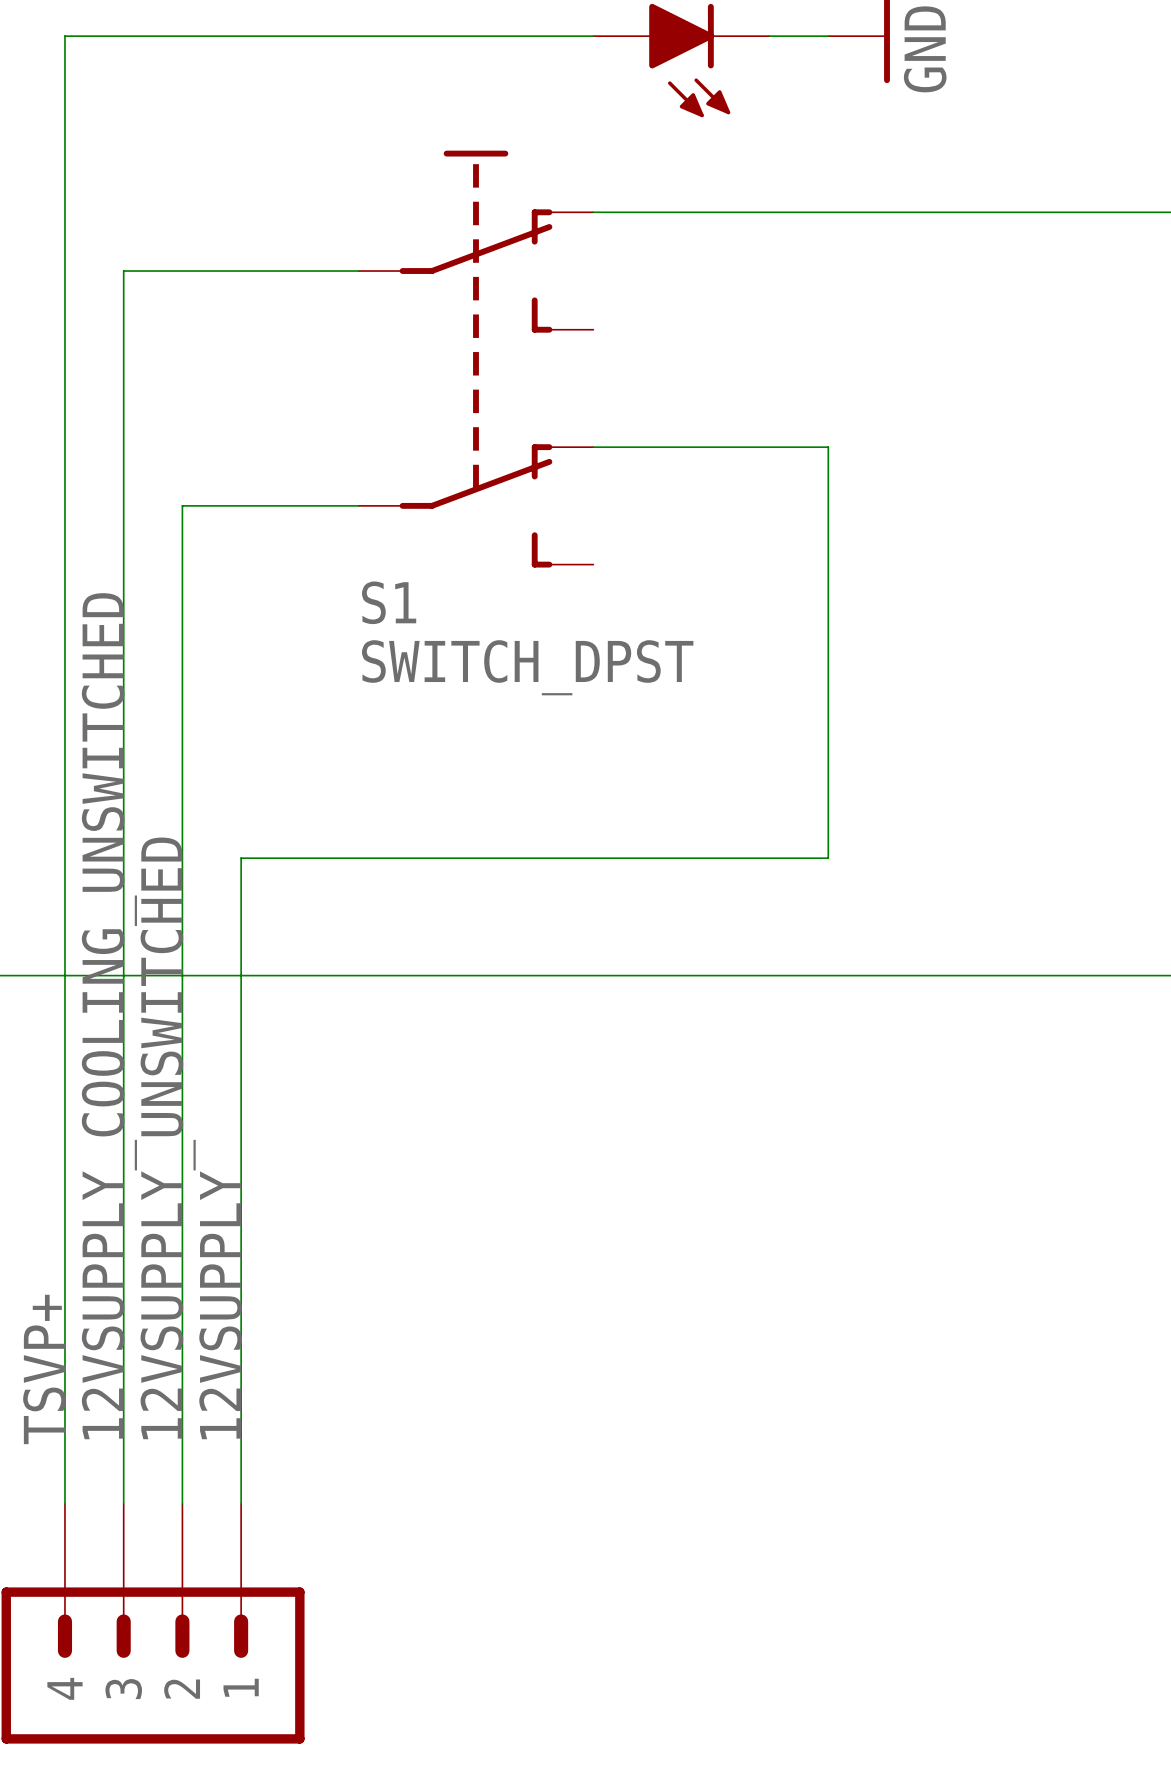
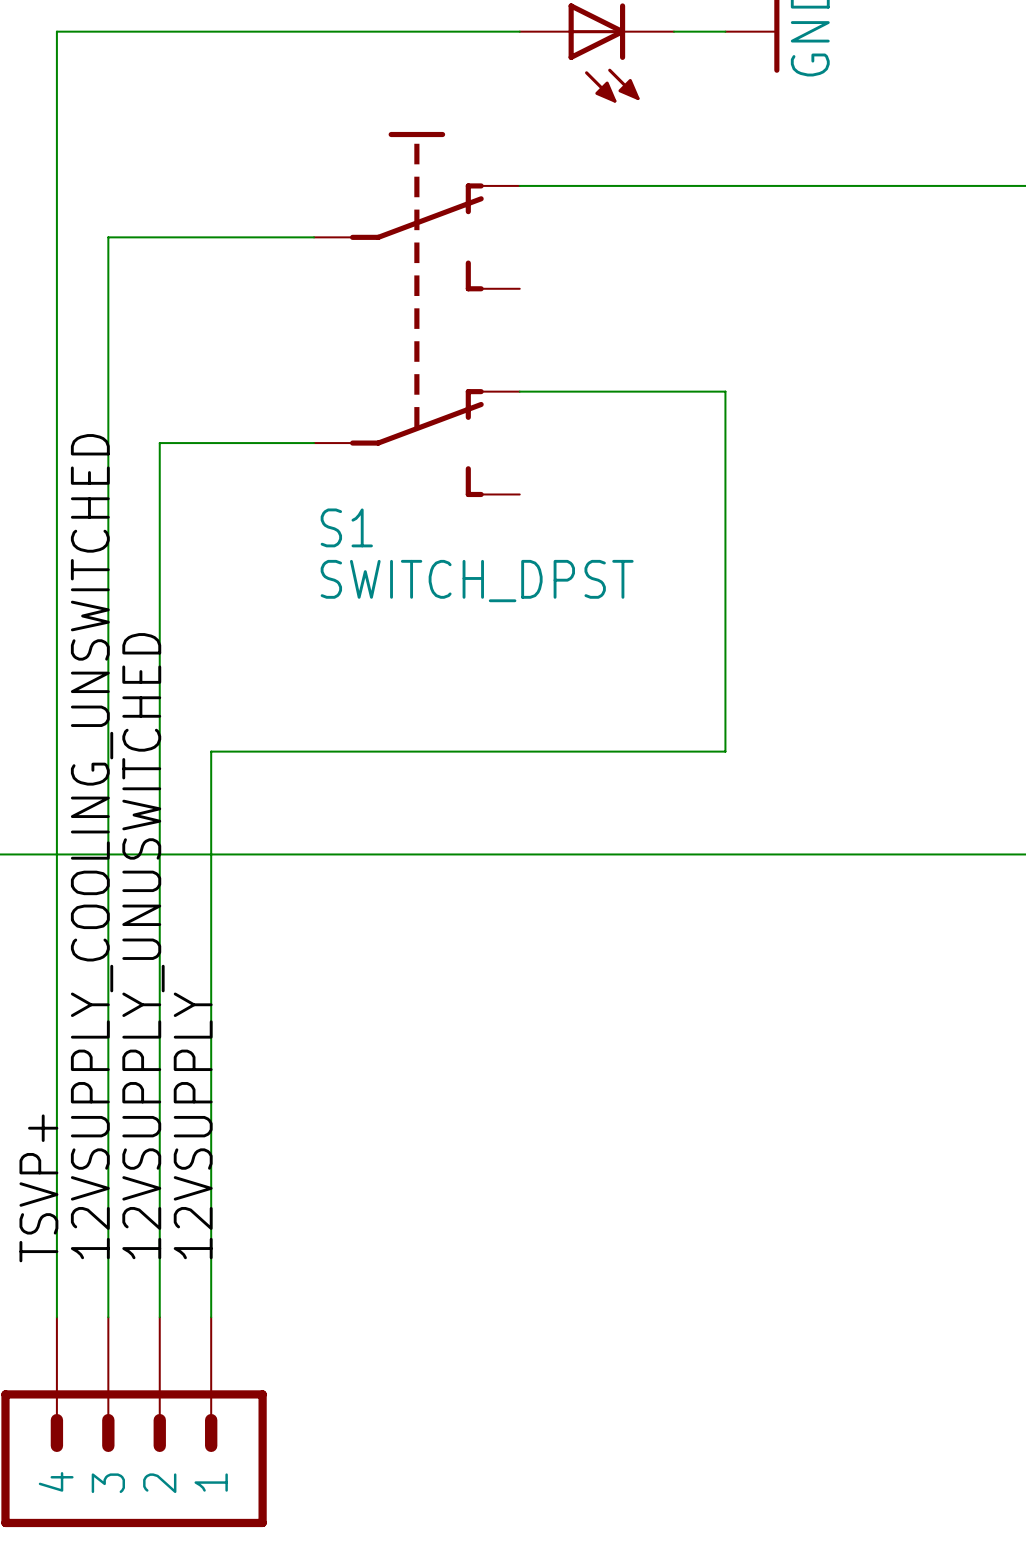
part symbol: [593, 3, 770, 118] -> [519, 3, 675, 103]
label: 12VSUPPLY_UNSWITCHED (168, 1138) -> 12VSUPPLY_UNUSWITCHED (143, 946)

